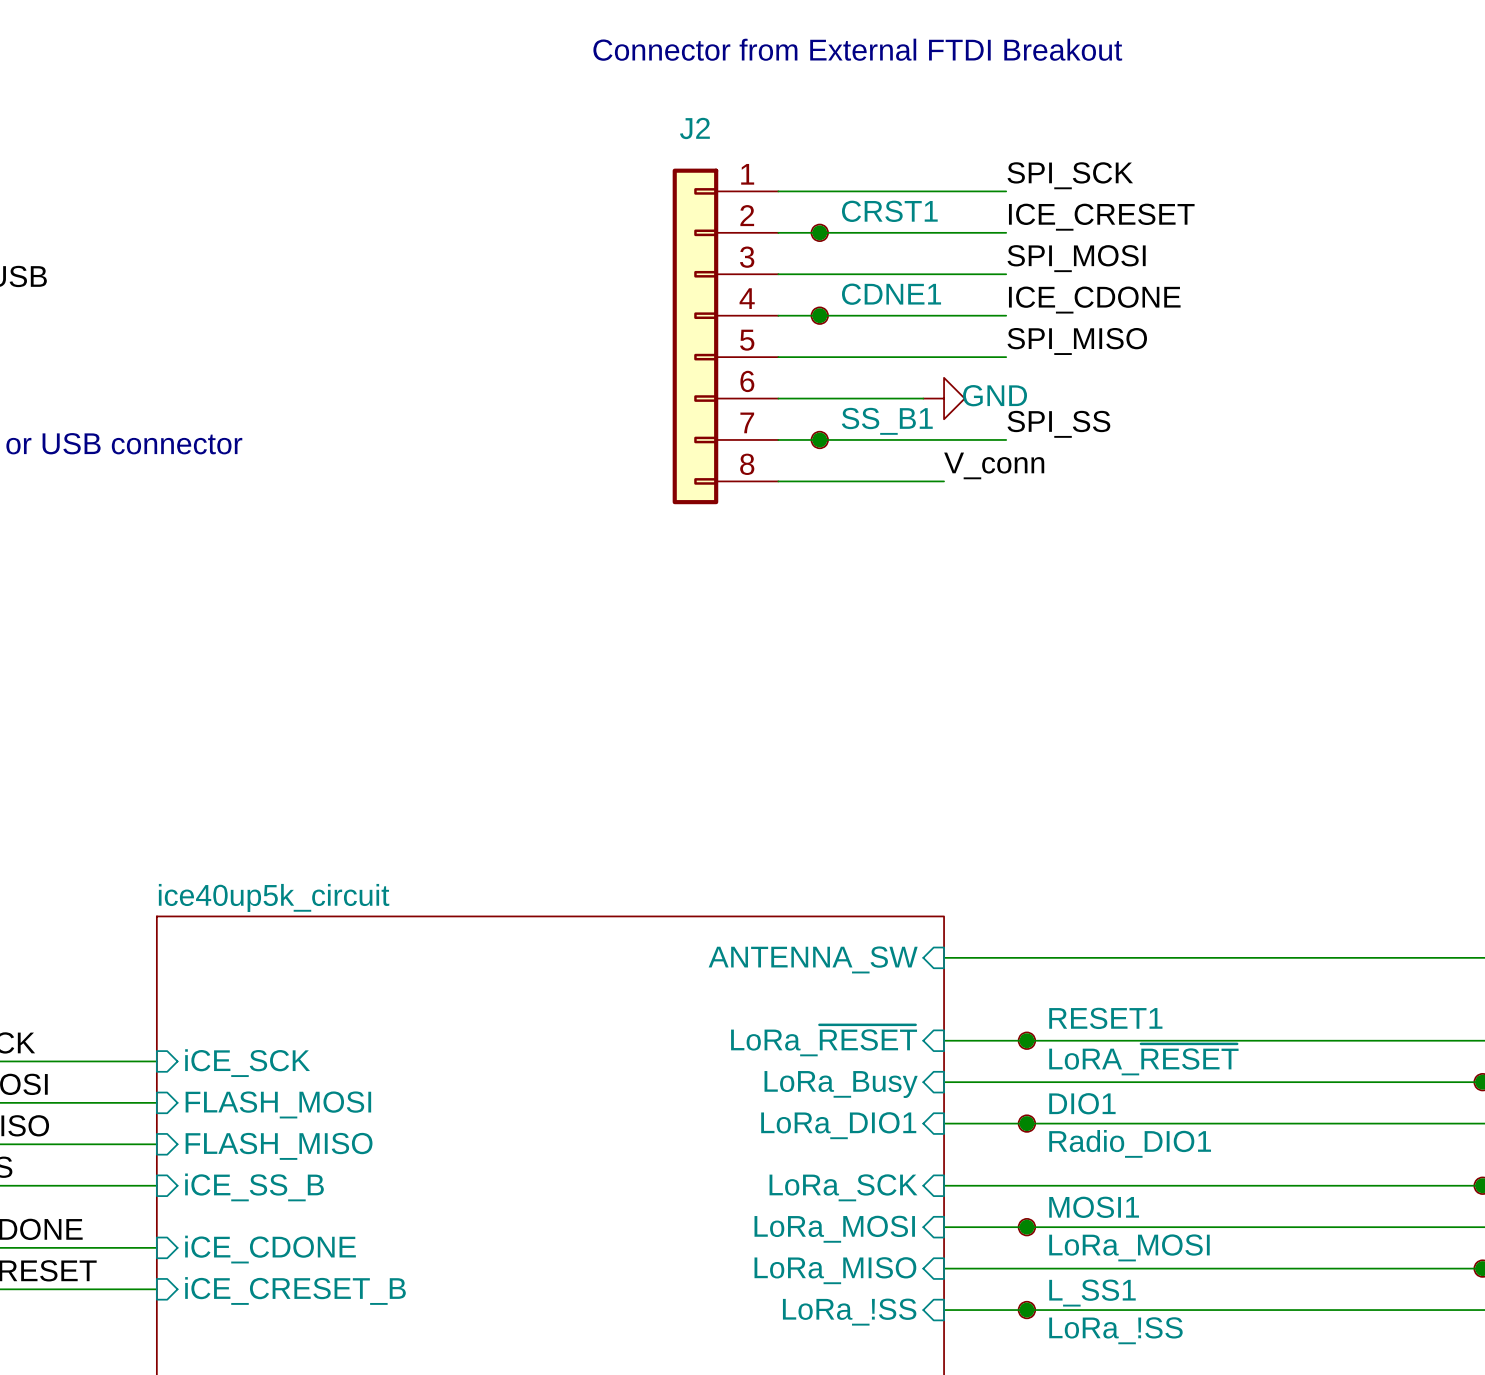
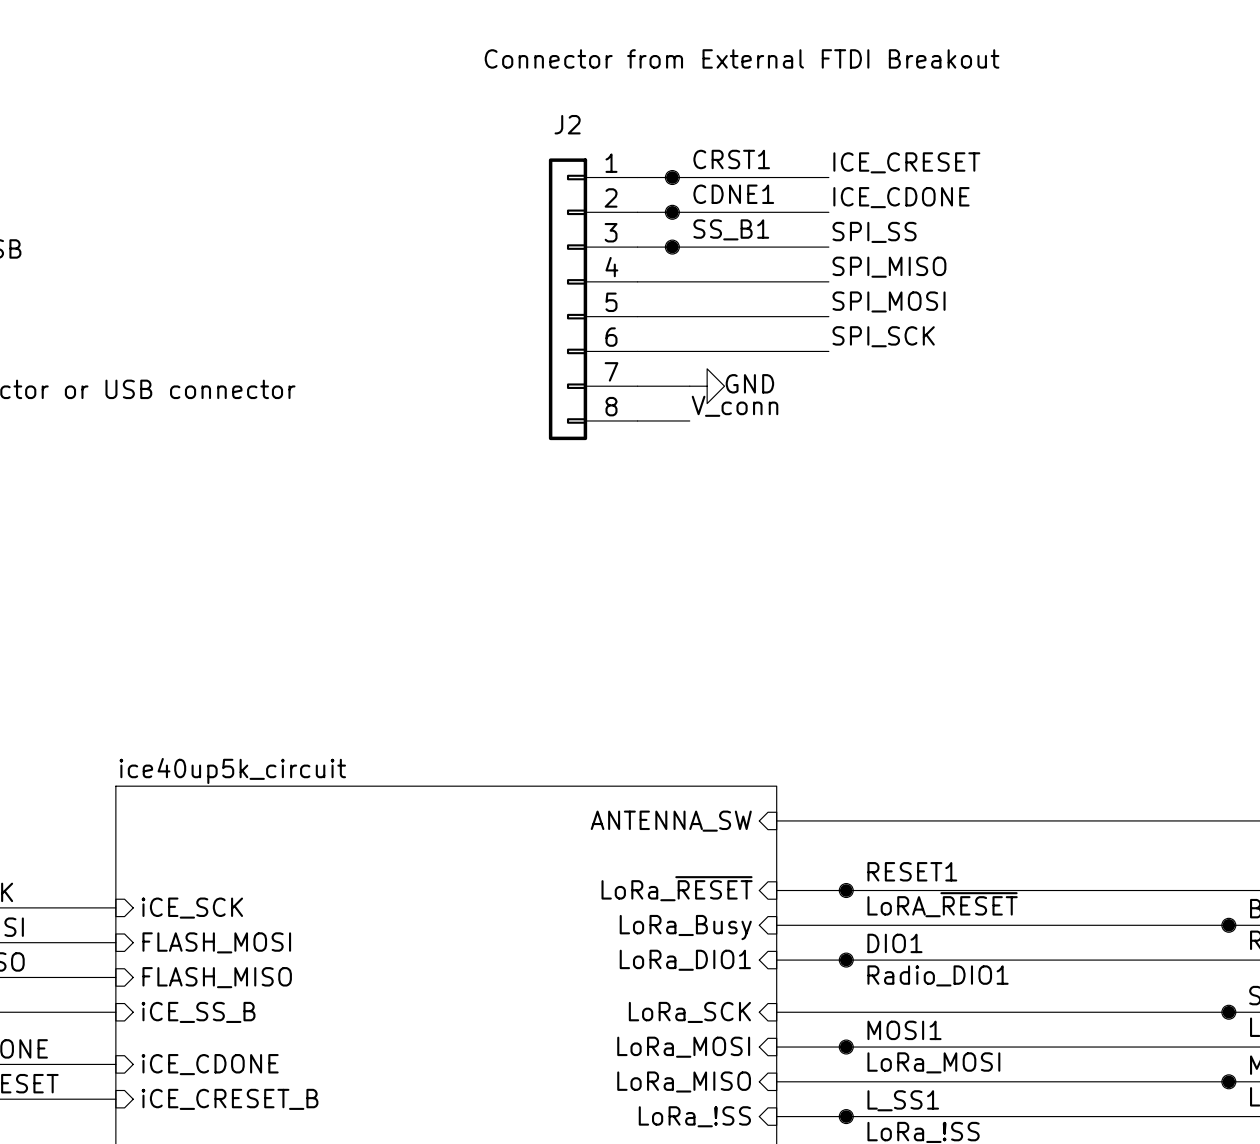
label: SPI_SCK (1070, 175) -> ICE_CRESET (906, 162)
CRST1: none -> (672, 177)
junction: none -> (672, 177)
CRST1 name: CRST1 (889, 211) -> CDNE1 (733, 194)
label: ICE_CRESET (1101, 217) -> ICE_CDONE (901, 197)
label: SPI_MOSI (1076, 258) -> SPI_SS (874, 232)
label: ICE_CDONE (1094, 300) -> SPI_MISO (889, 267)
CDNE1: (819, 315) -> none
junction position: (819, 315) -> (672, 247)
label: SPI_MISO (1077, 341) -> SPI_MOSI (889, 301)
wire: none -> (759, 351) (828, 351)
power symbol position: GND (944, 398) -> GND (707, 386)
label: SPI_SS (1058, 424) -> SPI_SCK (883, 336)
SS_B1 position: (819, 439) -> (672, 247)
junction: (819, 439) -> none
wire: (840, 439) (1006, 439) -> none
label position: V_conn (994, 465) -> V_conn (735, 406)
wire: (840, 481) (944, 481) -> none

